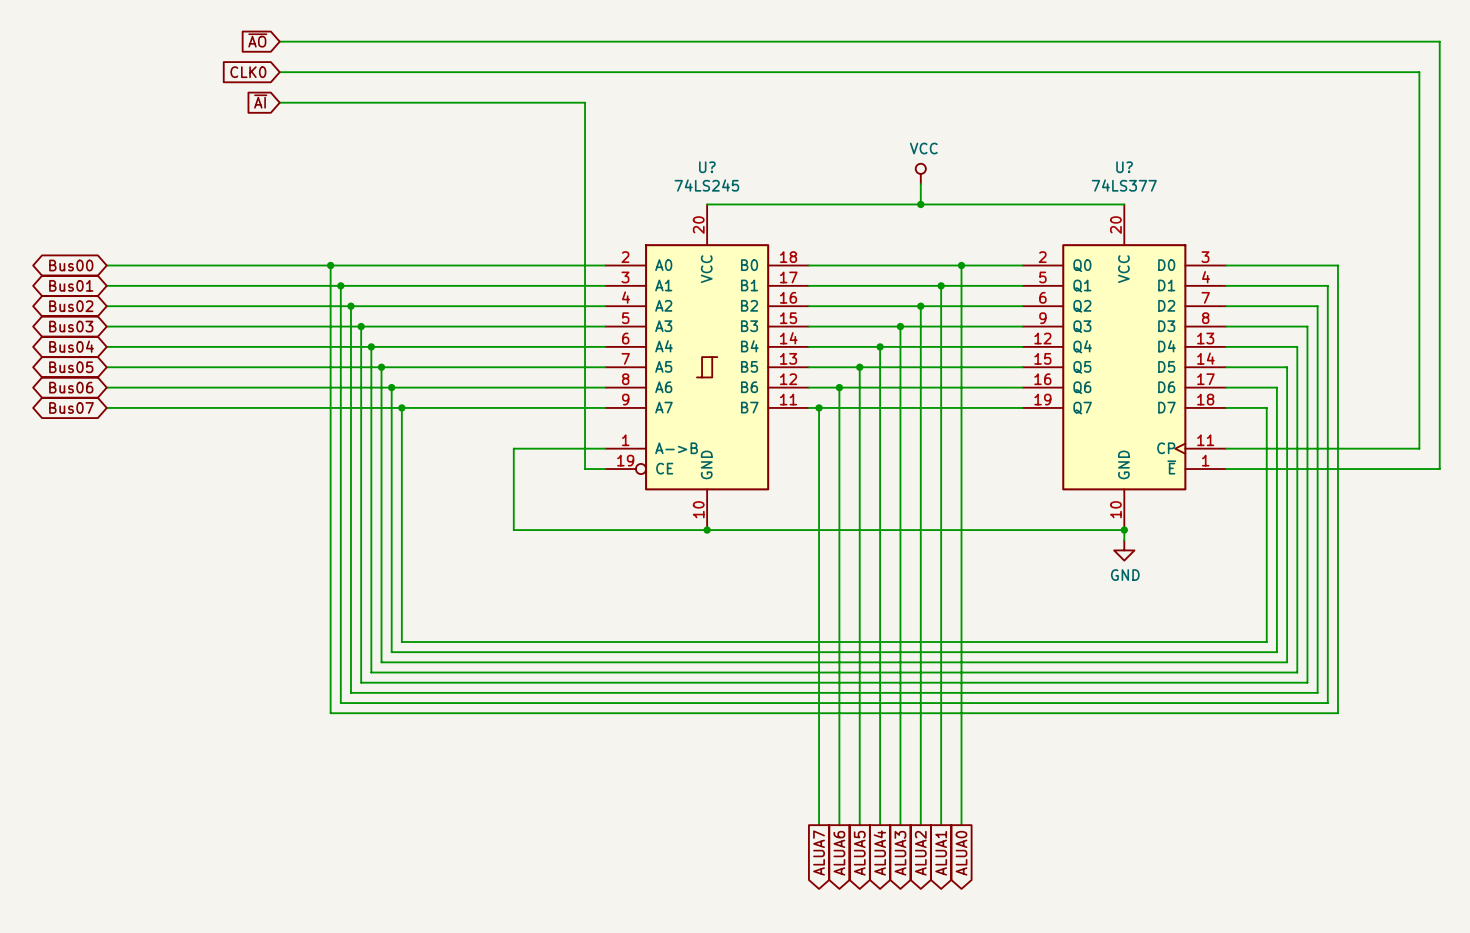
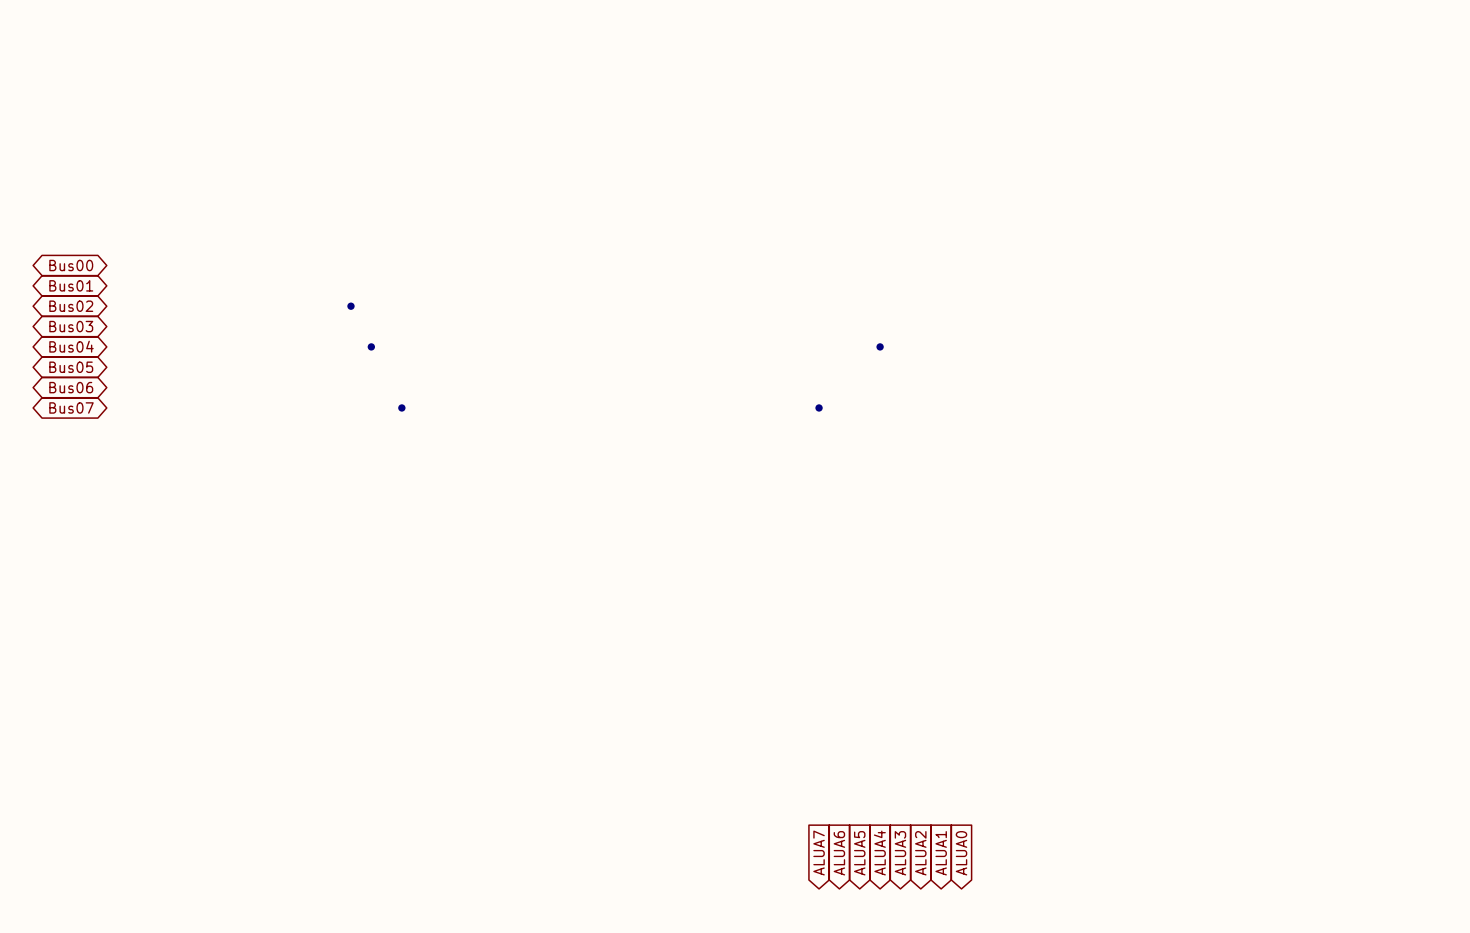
global label: ~{AO} (257, 40) -> none
wire: (279, 41) (1439, 41) (1439, 469) (1226, 469) -> none
global label: CLK0 (248, 72) -> none
wire: (279, 72) (1419, 72) (1419, 448) (1226, 448) -> none
global label: ~{AI} (260, 101) -> none
wire: (279, 102) (585, 102) (585, 469) (605, 469) -> none
power symbol: VCC (920, 173) -> none
wire: (920, 184) (920, 204) -> none
wire: (707, 204) (1124, 204) -> none
junction: (920, 204) -> none
wire: (106, 265) (605, 265) -> none
wire: (330, 265) (330, 713) (1337, 713) (1337, 265) (1226, 265) -> none
junction: (330, 265) -> none
wire: (808, 265) (1022, 265) -> none
wire: (961, 265) (961, 825) -> none
junction: (961, 265) -> none
wire: (106, 285) (605, 285) -> none
wire: (340, 285) (340, 703) (1327, 703) (1327, 285) (1226, 285) -> none
junction: (340, 285) -> none
wire: (808, 285) (1022, 285) -> none
wire: (941, 285) (941, 825) -> none
junction: (941, 285) -> none
wire: (106, 306) (605, 306) -> none
wire: (350, 306) (350, 692) (1317, 692) (1317, 306) (1226, 306) -> none
wire: (808, 306) (1022, 306) -> none
wire: (920, 306) (920, 825) -> none
junction: (920, 306) -> none
wire: (106, 326) (605, 326) -> none
wire: (361, 326) (361, 682) (1307, 682) (1307, 326) (1226, 326) -> none
junction: (361, 326) -> none
wire: (808, 326) (1022, 326) -> none
wire: (900, 326) (900, 825) -> none
junction: (900, 326) -> none
wire: (106, 346) (605, 346) -> none
wire: (371, 346) (371, 672) (1297, 672) (1297, 346) (1226, 346) -> none
wire: (808, 346) (1022, 346) -> none
wire: (880, 346) (880, 825) -> none
wire: (106, 367) (605, 367) -> none
wire: (381, 367) (381, 662) (1287, 662) (1287, 367) (1226, 367) -> none
junction: (381, 367) -> none
U?: 74LS245 (707, 367) -> none
wire: (808, 367) (1022, 367) -> none
wire: (859, 367) (859, 825) -> none
junction: (859, 367) -> none
U?: 74LS377 (1124, 367) -> none
wire: (106, 387) (605, 387) -> none
wire: (391, 387) (391, 652) (1276, 652) (1276, 387) (1226, 387) -> none
junction: (391, 387) -> none
wire: (808, 387) (1022, 387) -> none
wire: (839, 387) (839, 825) -> none
junction: (839, 387) -> none
wire: (106, 407) (605, 407) -> none
wire: (401, 407) (401, 641) (1266, 641) (1266, 407) (1226, 407) -> none
wire: (808, 407) (1022, 407) -> none
wire: (819, 407) (819, 825) -> none
wire: (605, 448) (513, 448) (513, 530) (1124, 530) (1124, 540) -> none
junction: (707, 530) -> none
junction: (1124, 530) -> none
power symbol: GND (1124, 550) -> none

